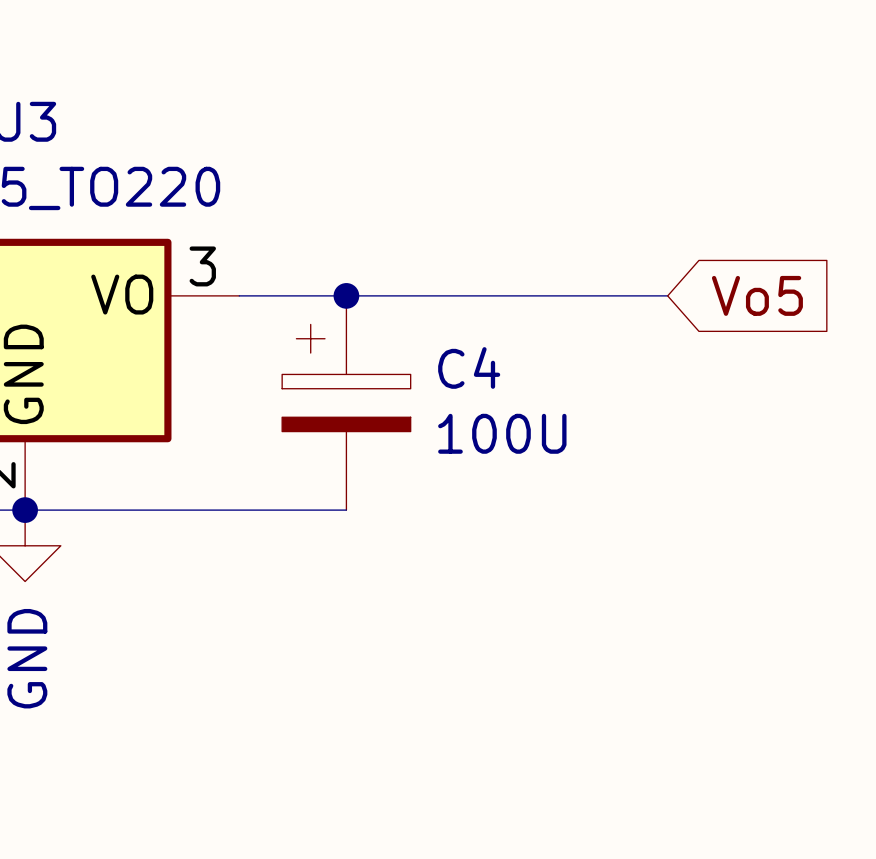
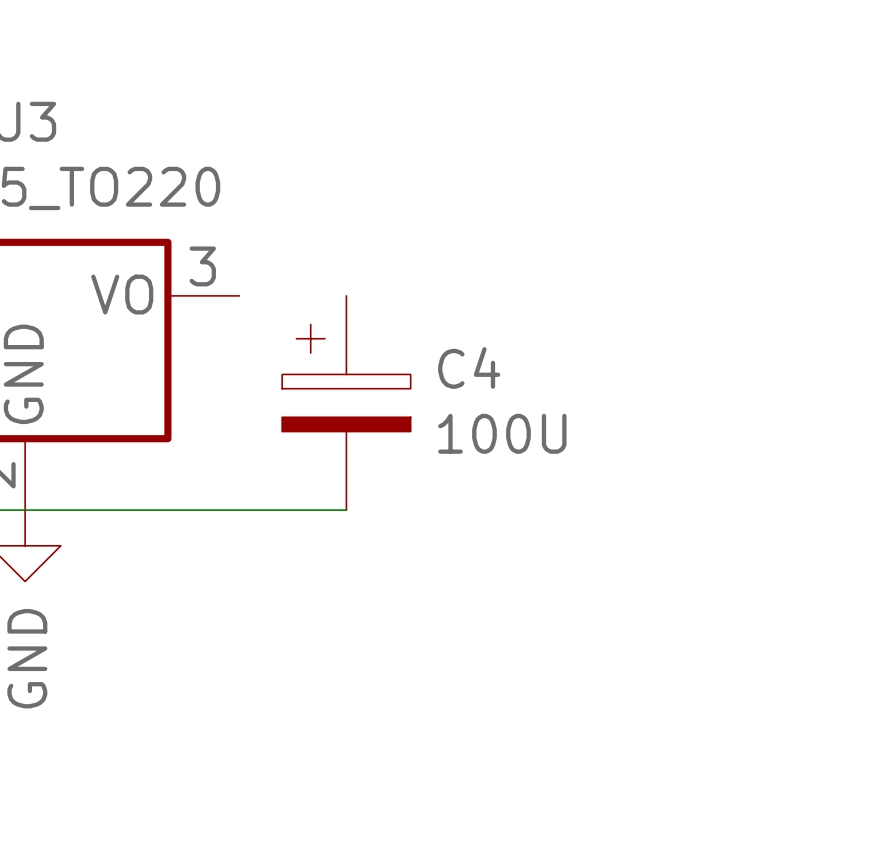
wire: (239, 295) (667, 295) -> none
junction: (346, 295) -> none
global label: Vo5 (757, 295) -> none
junction: (25, 510) -> none

